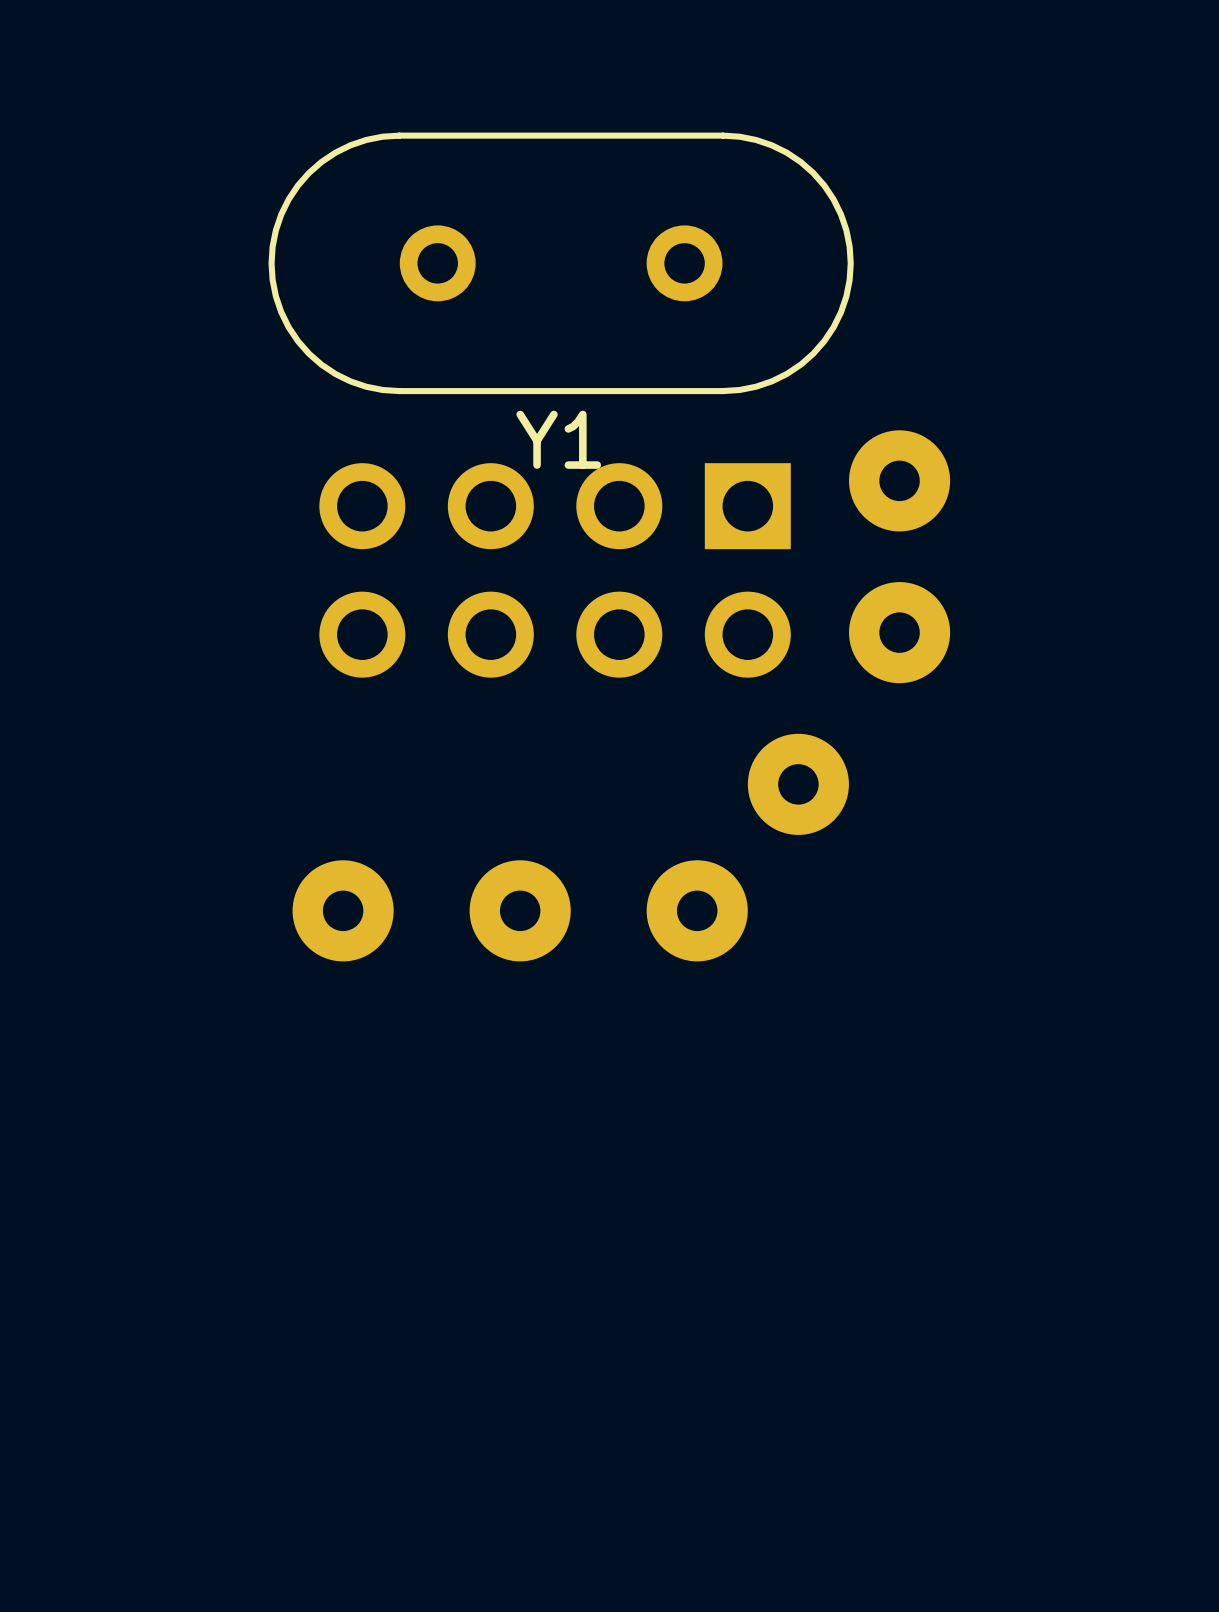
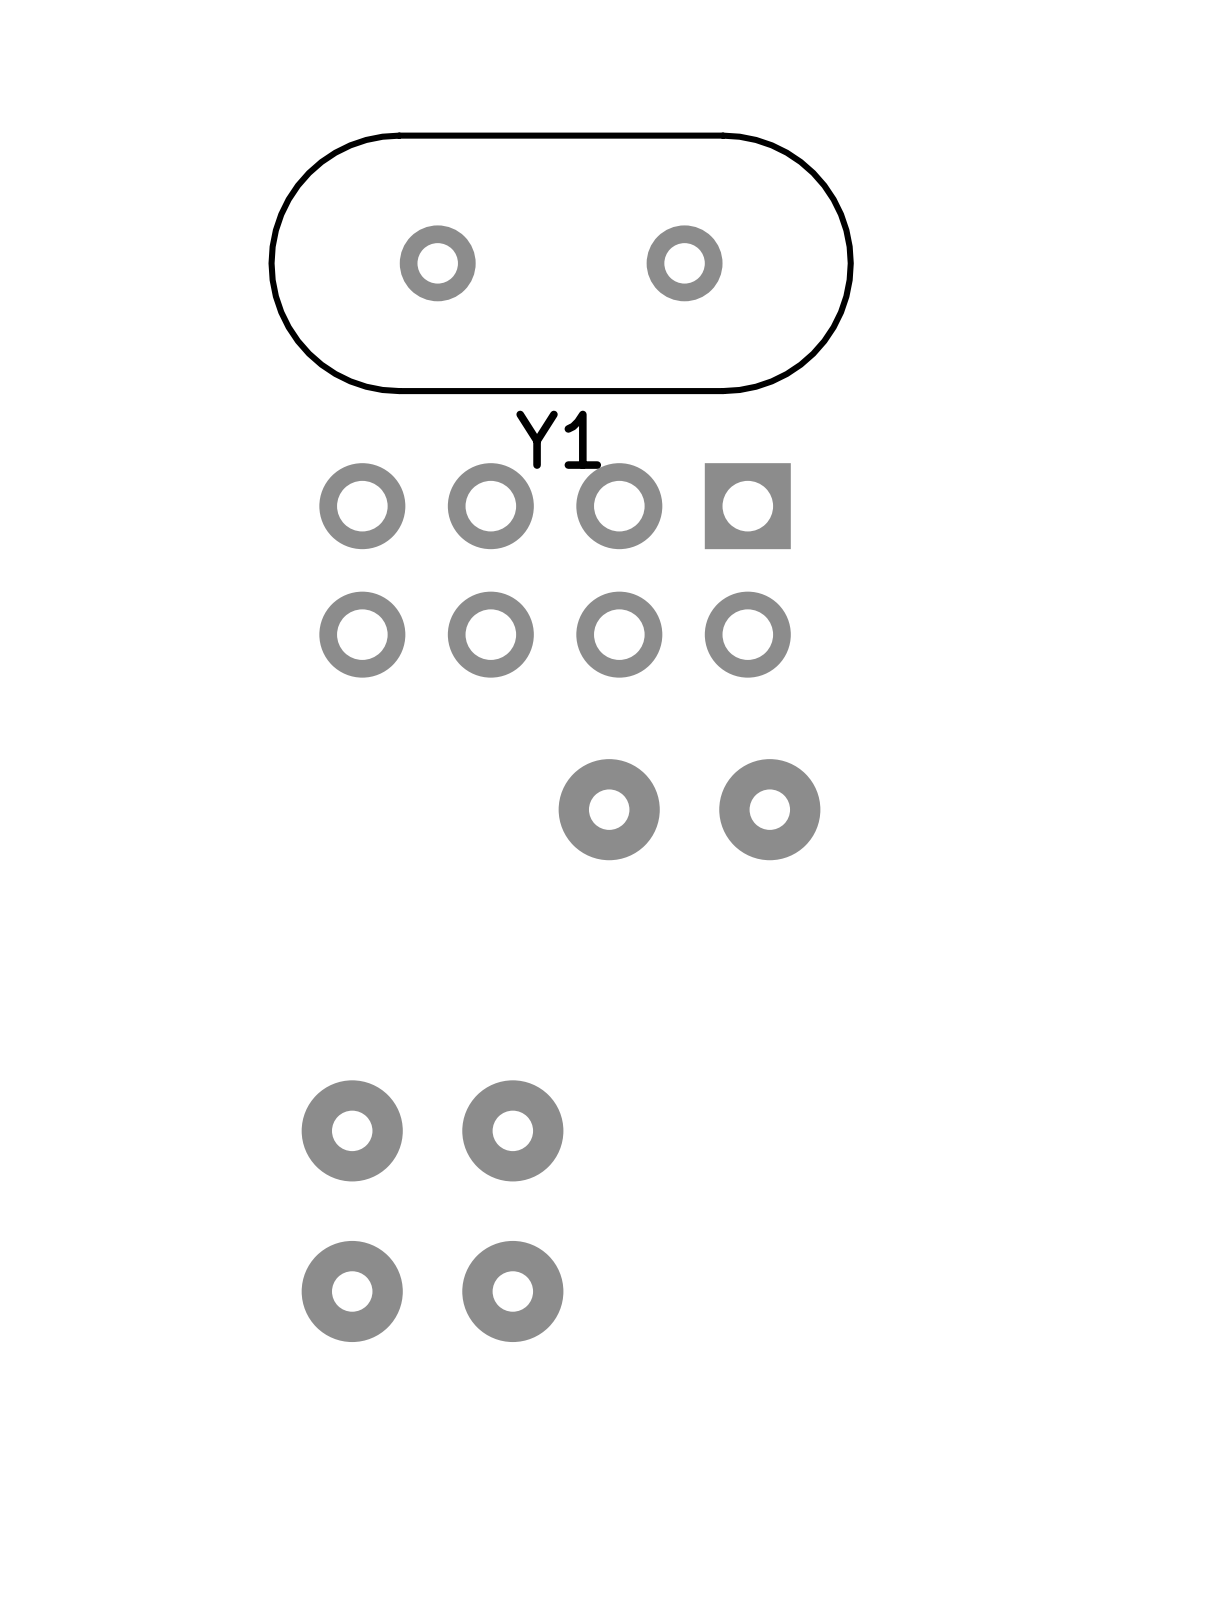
part: (899, 480) -> none
part: (899, 632) -> none
part position: (798, 784) -> (769, 809)
part: none -> (609, 809)
part: (343, 910) -> none
part: (520, 910) -> none
part: (697, 910) -> none
part: none -> (352, 1130)
part: none -> (512, 1130)
part: none -> (352, 1291)
part: none -> (512, 1291)

